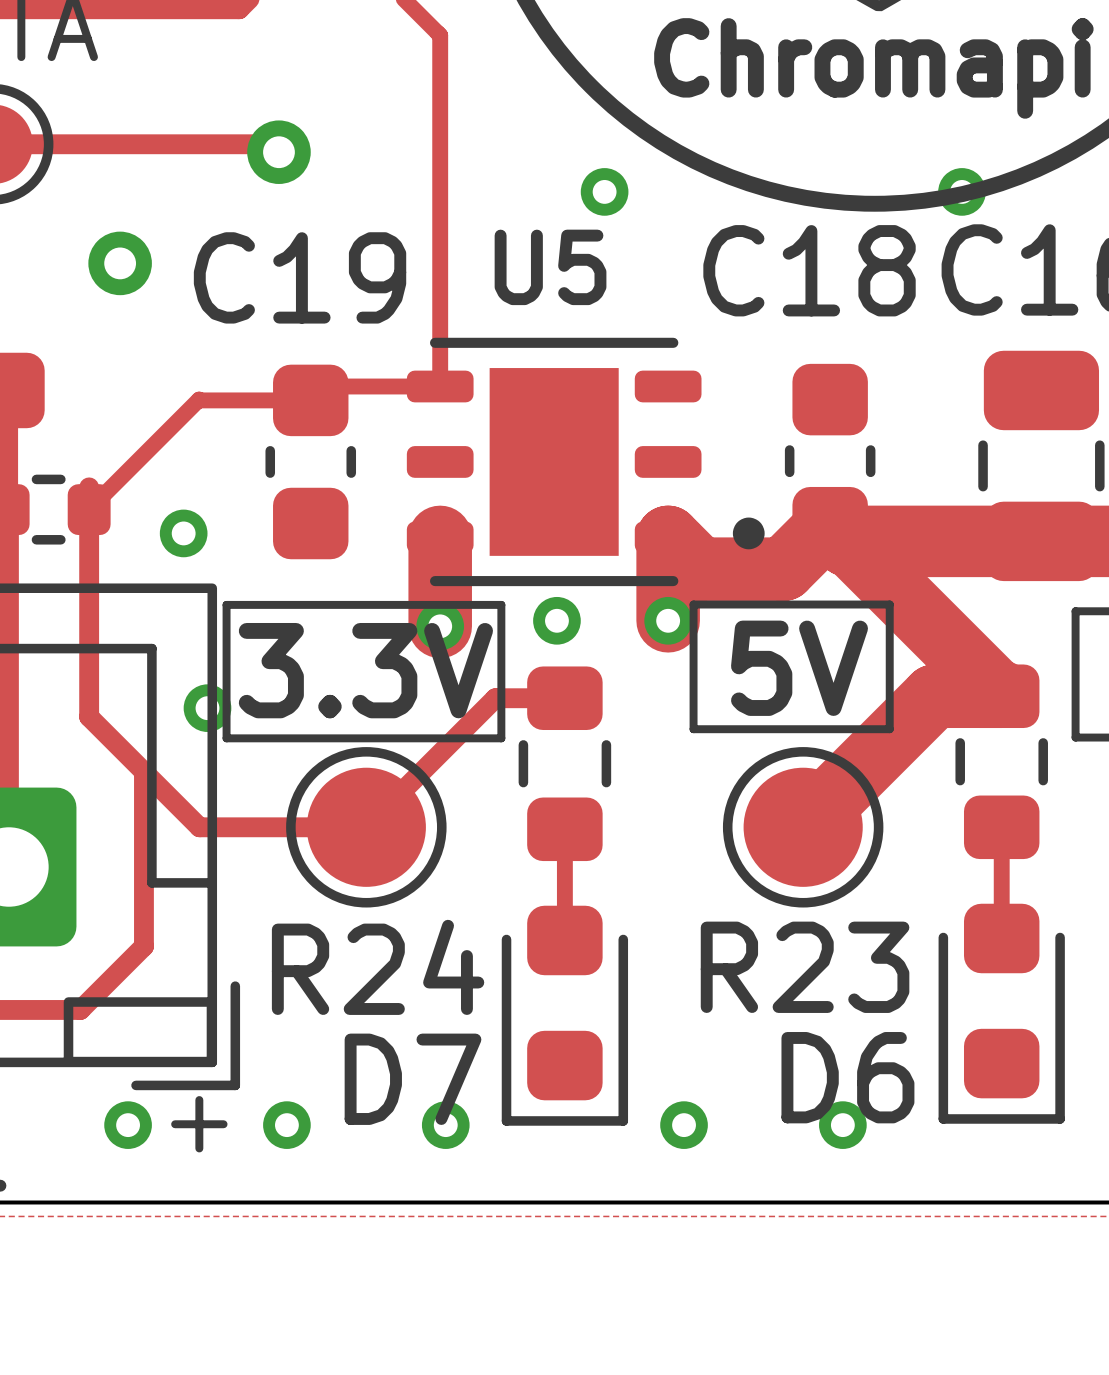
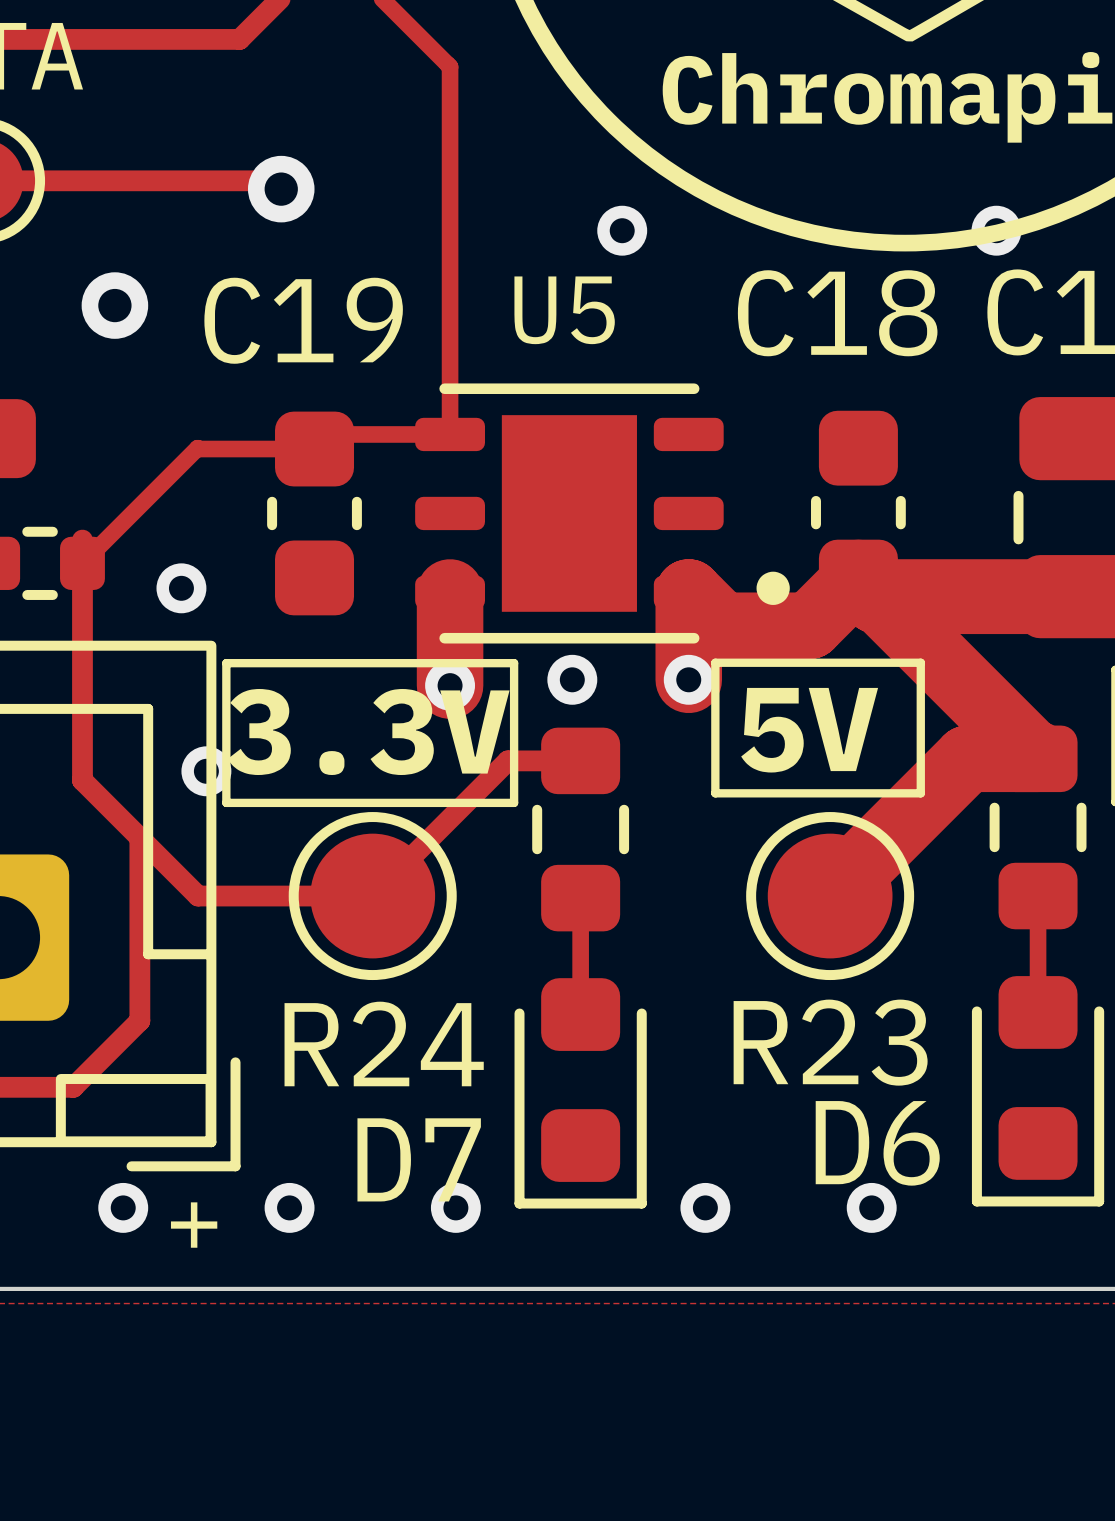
D6 name position: D6 (847, 1077) -> D6 (877, 1143)

